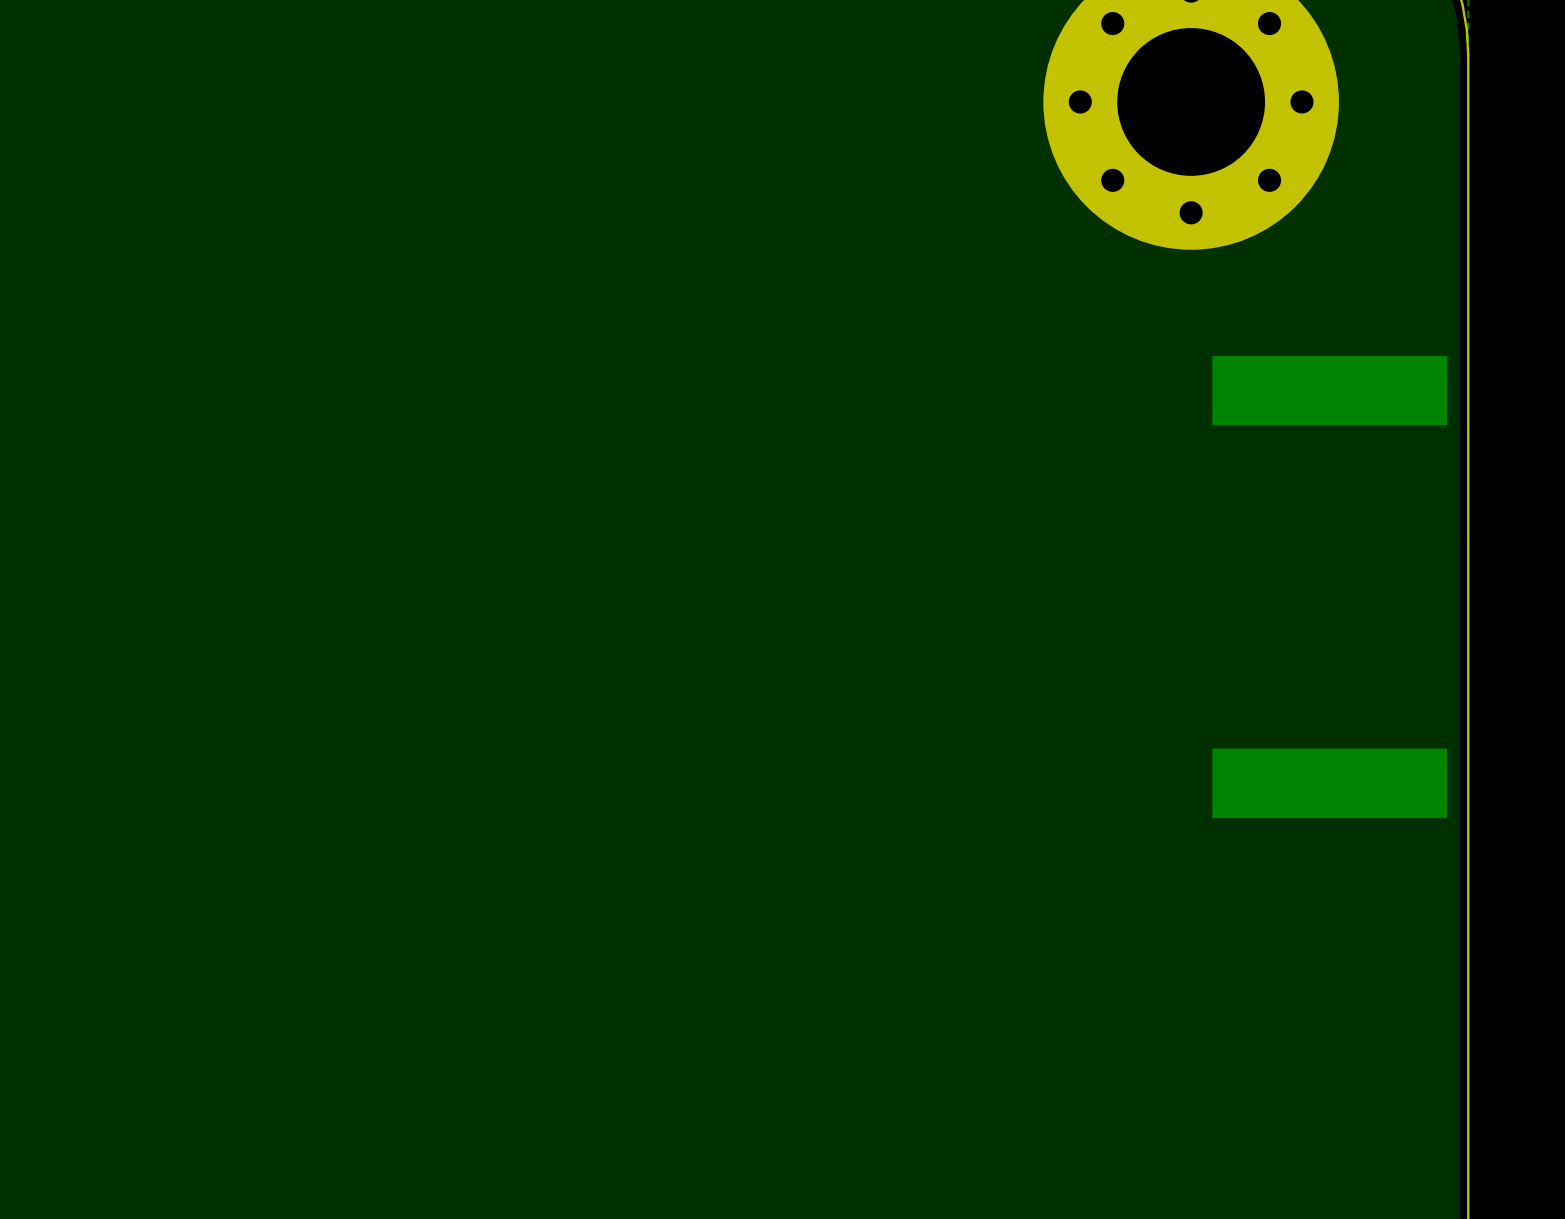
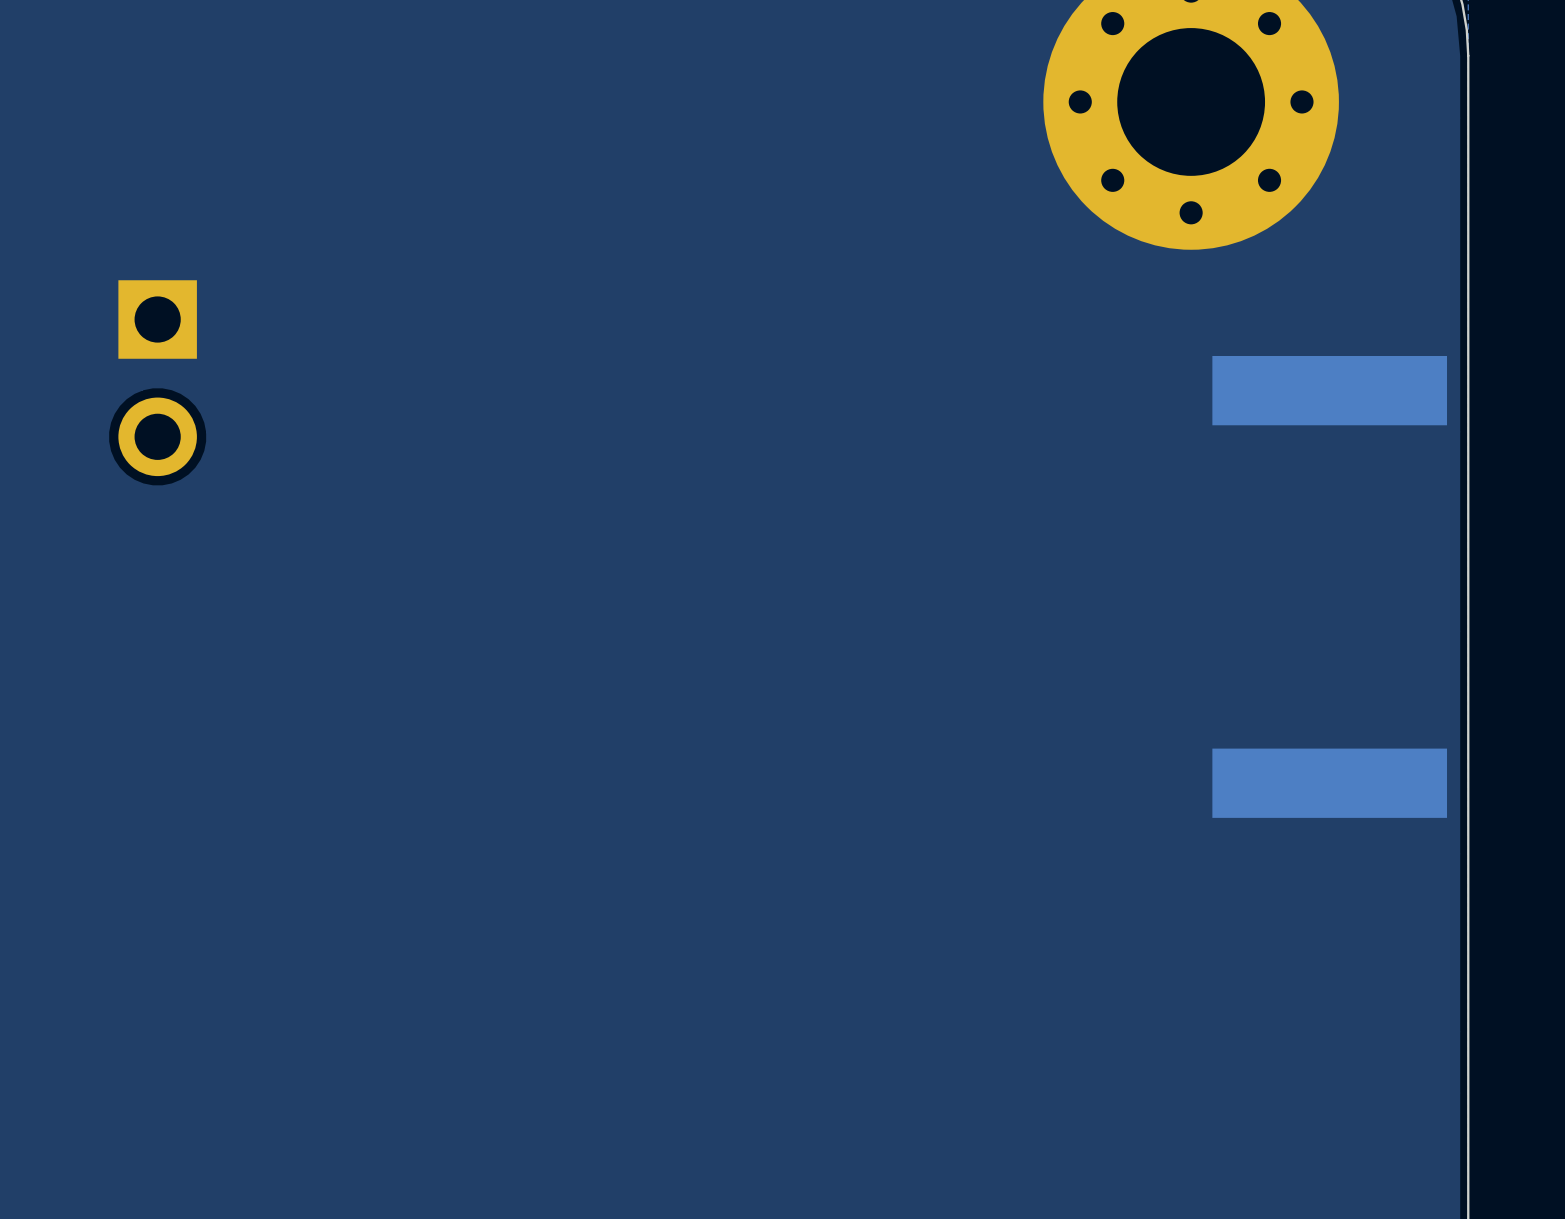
part: none -> (157, 378)

